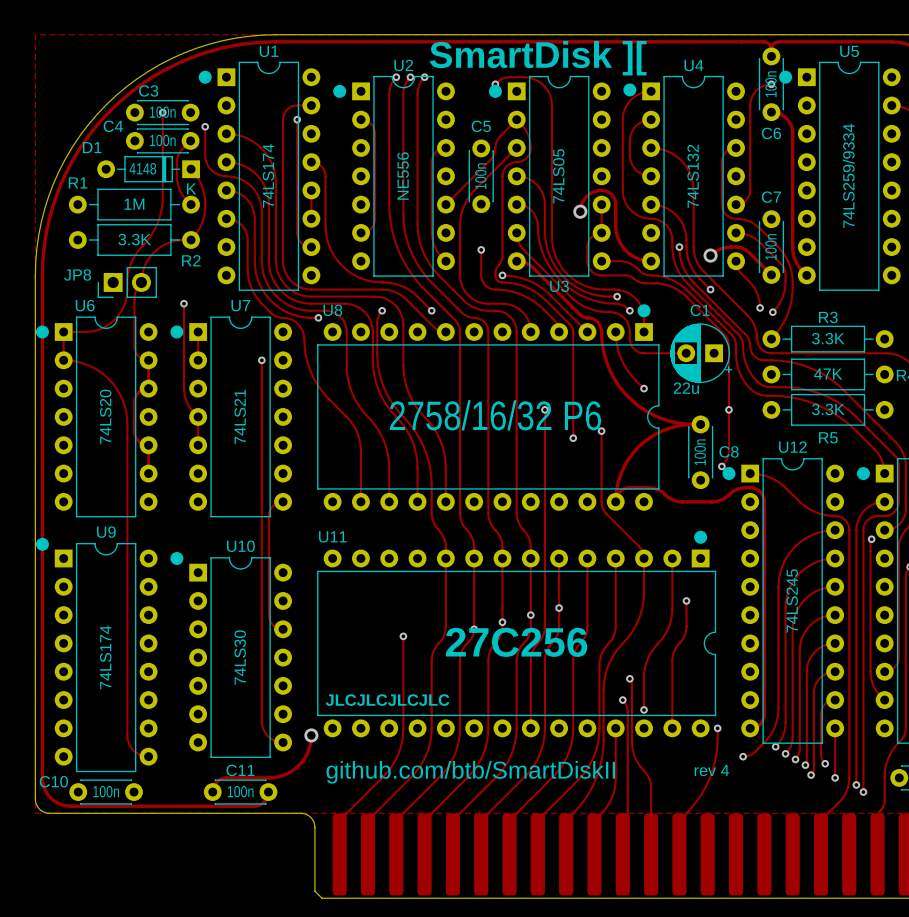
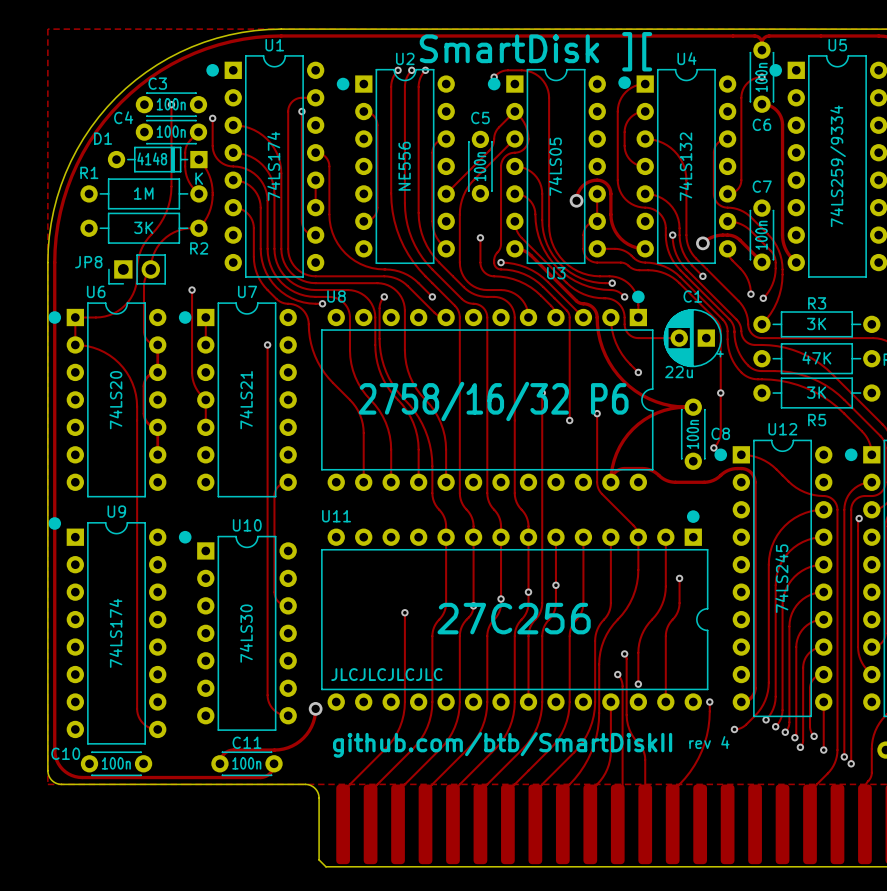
R2 value: 3.3K (134, 239) -> 3K (143, 227)
R3 value: 3.3K (828, 338) -> 3K (816, 323)
R5 value: 3.3K (828, 409) -> 3K (816, 392)

